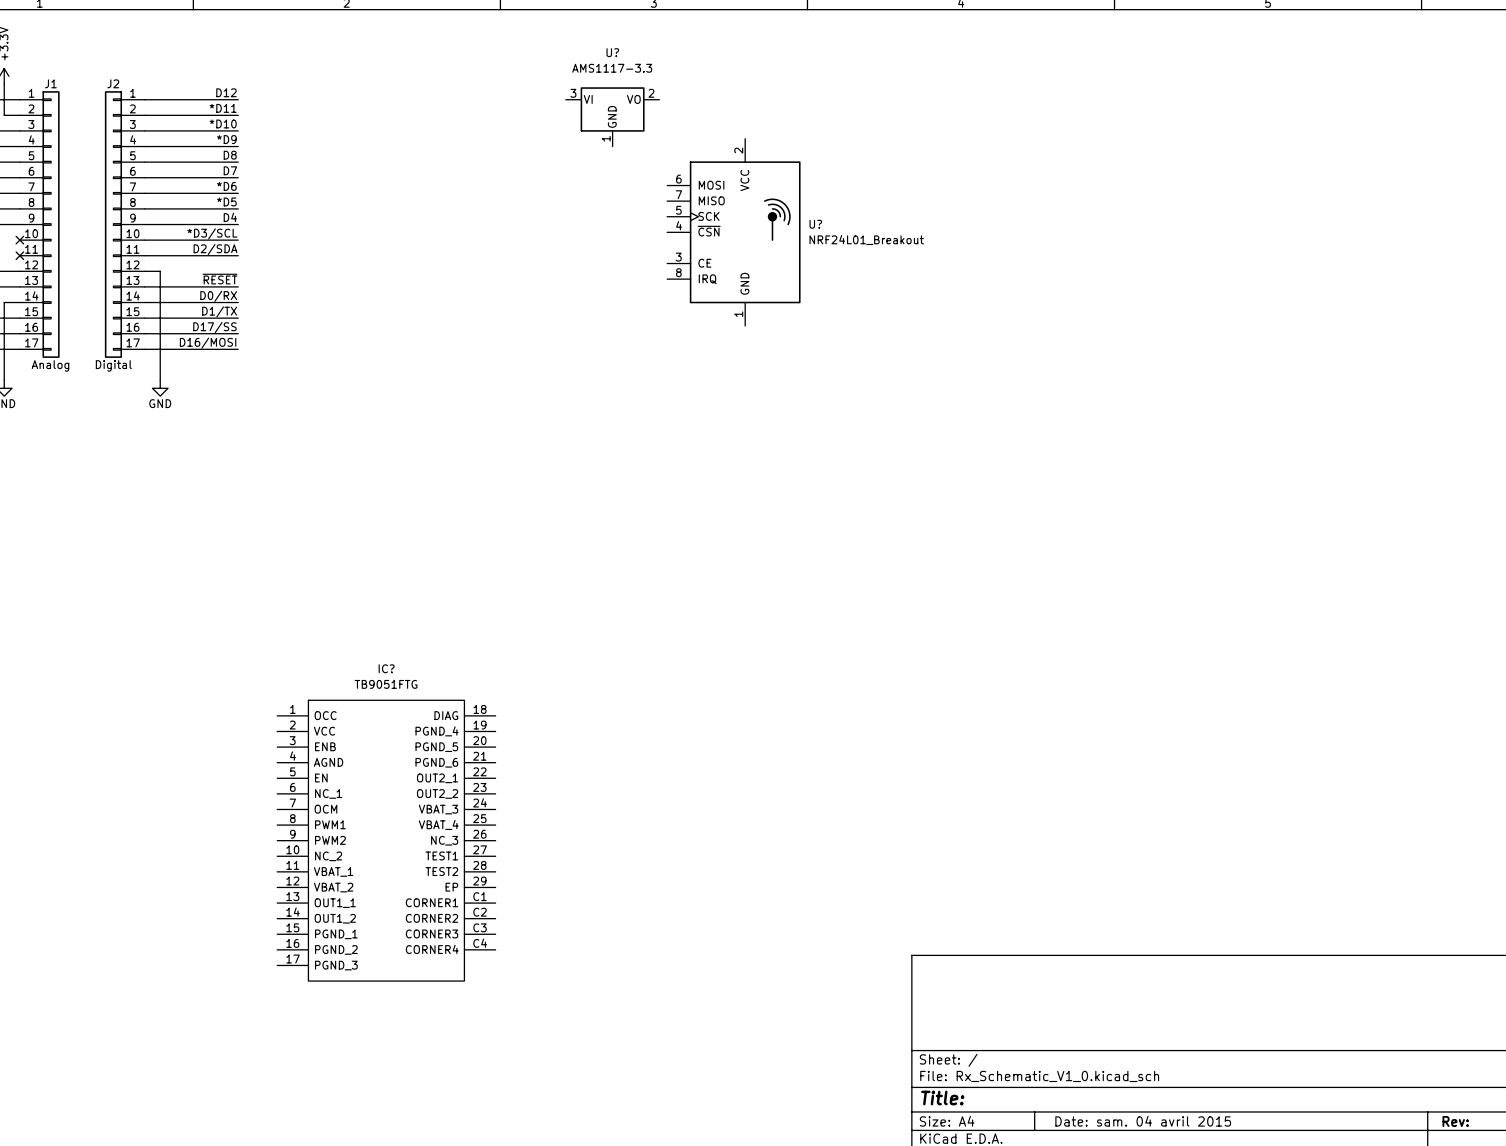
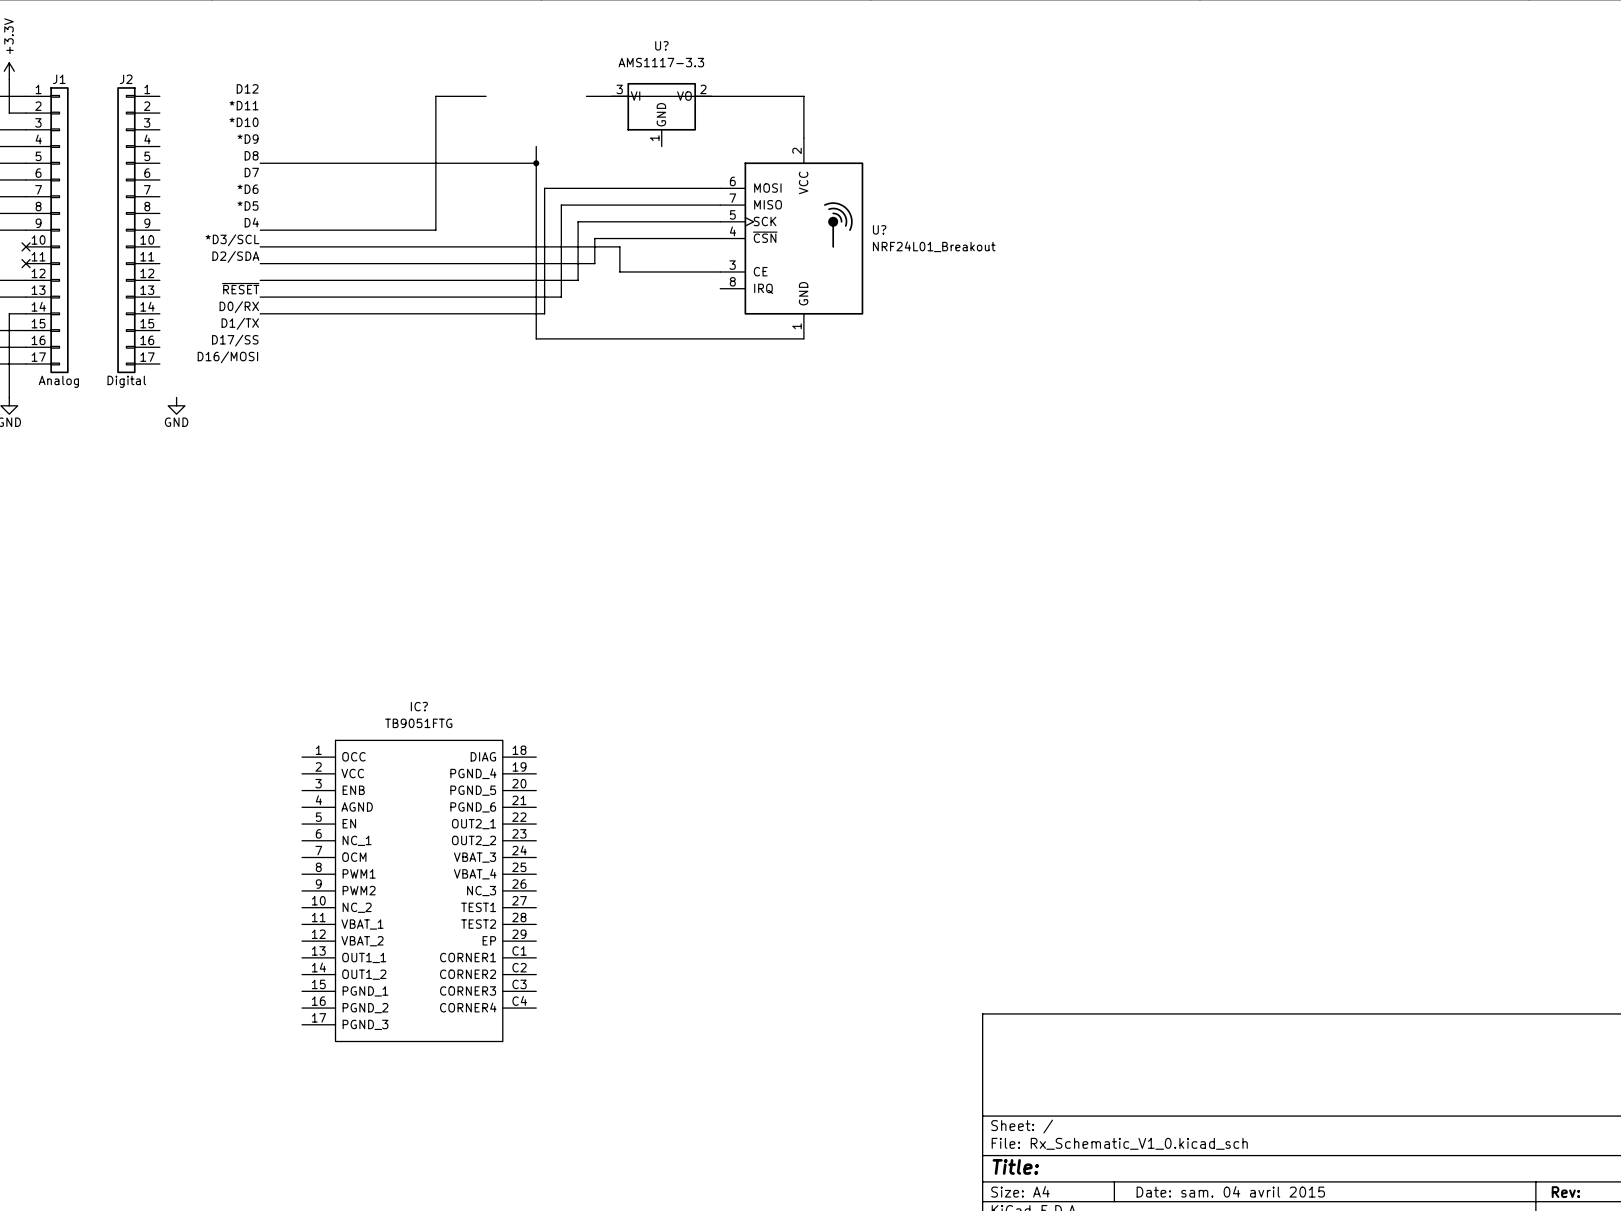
wire: (144, 99) (238, 99) -> none
wire: none -> (586, 96) (803, 96) (803, 138)
wire: (144, 115) (238, 115) -> none
wire: (144, 130) (238, 130) -> none
wire: (144, 146) (238, 146) -> none
wire: none -> (536, 146) (536, 338) (803, 338)
wire: (144, 162) (238, 162) -> (536, 163) (260, 163)
junction: none -> (536, 163)
wire: (144, 177) (238, 177) -> none
wire: (144, 193) (238, 193) -> none
wire: (144, 208) (238, 208) -> none
wire: none -> (720, 221) (578, 221) (578, 280) (260, 280)
wire: (144, 224) (238, 224) -> (486, 96) (435, 96) (435, 230) (260, 230)
wire: (144, 240) (238, 240) -> (720, 271) (619, 271) (619, 246) (260, 246)
wire: (144, 255) (238, 255) -> (720, 238) (594, 238) (594, 263) (260, 263)
wire: (144, 271) (160, 271) (160, 380) -> none
wire: (144, 286) (238, 286) -> (720, 205) (561, 205) (561, 297) (260, 297)
wire: (144, 302) (238, 302) -> (720, 188) (544, 188) (544, 313) (260, 313)
wire: (144, 318) (238, 318) -> none
wire: (144, 333) (238, 333) -> none
wire: (144, 349) (238, 349) -> none

